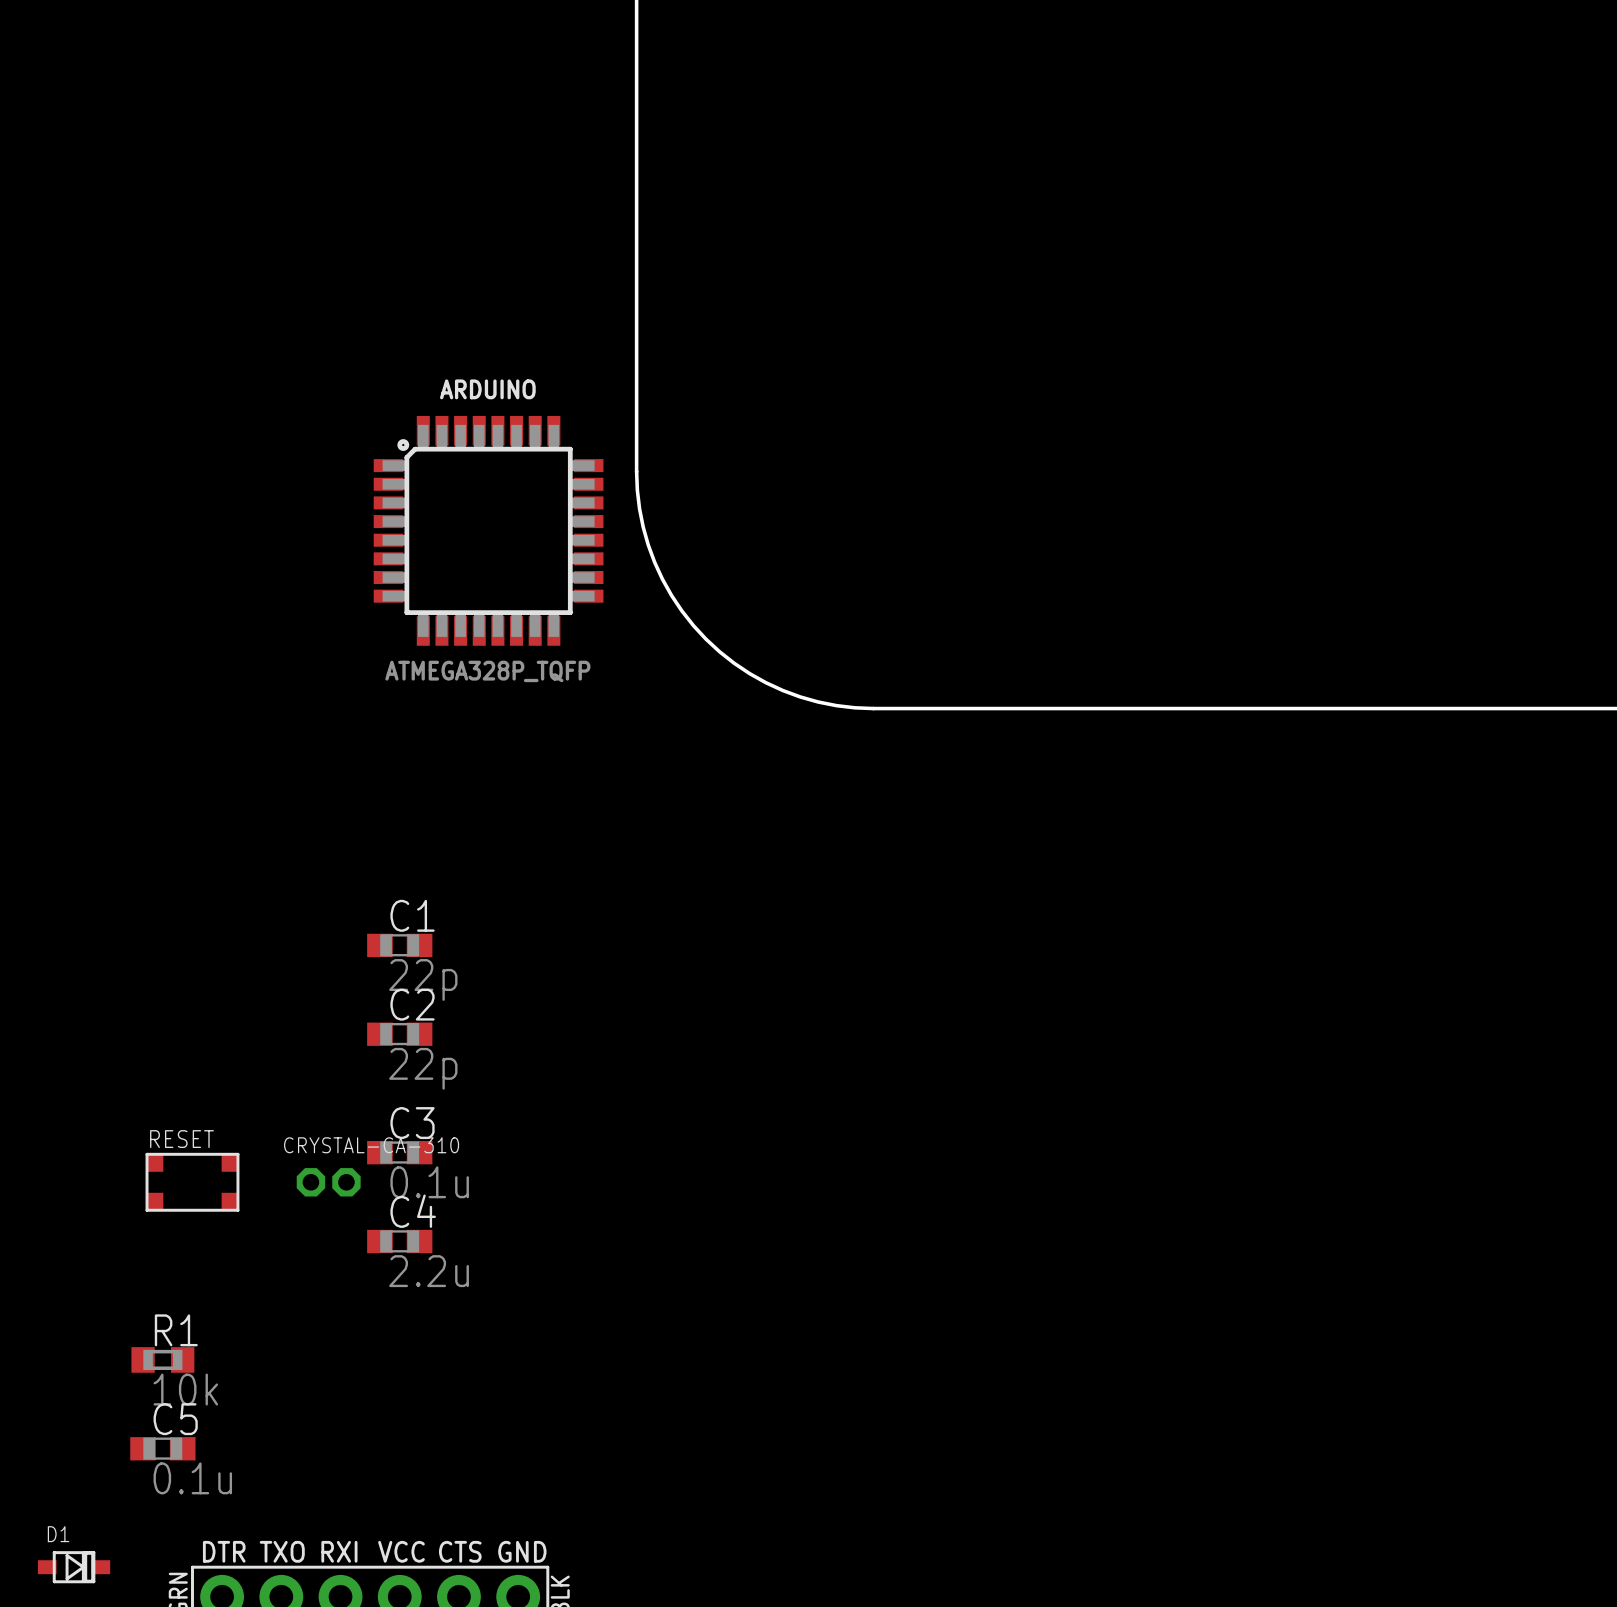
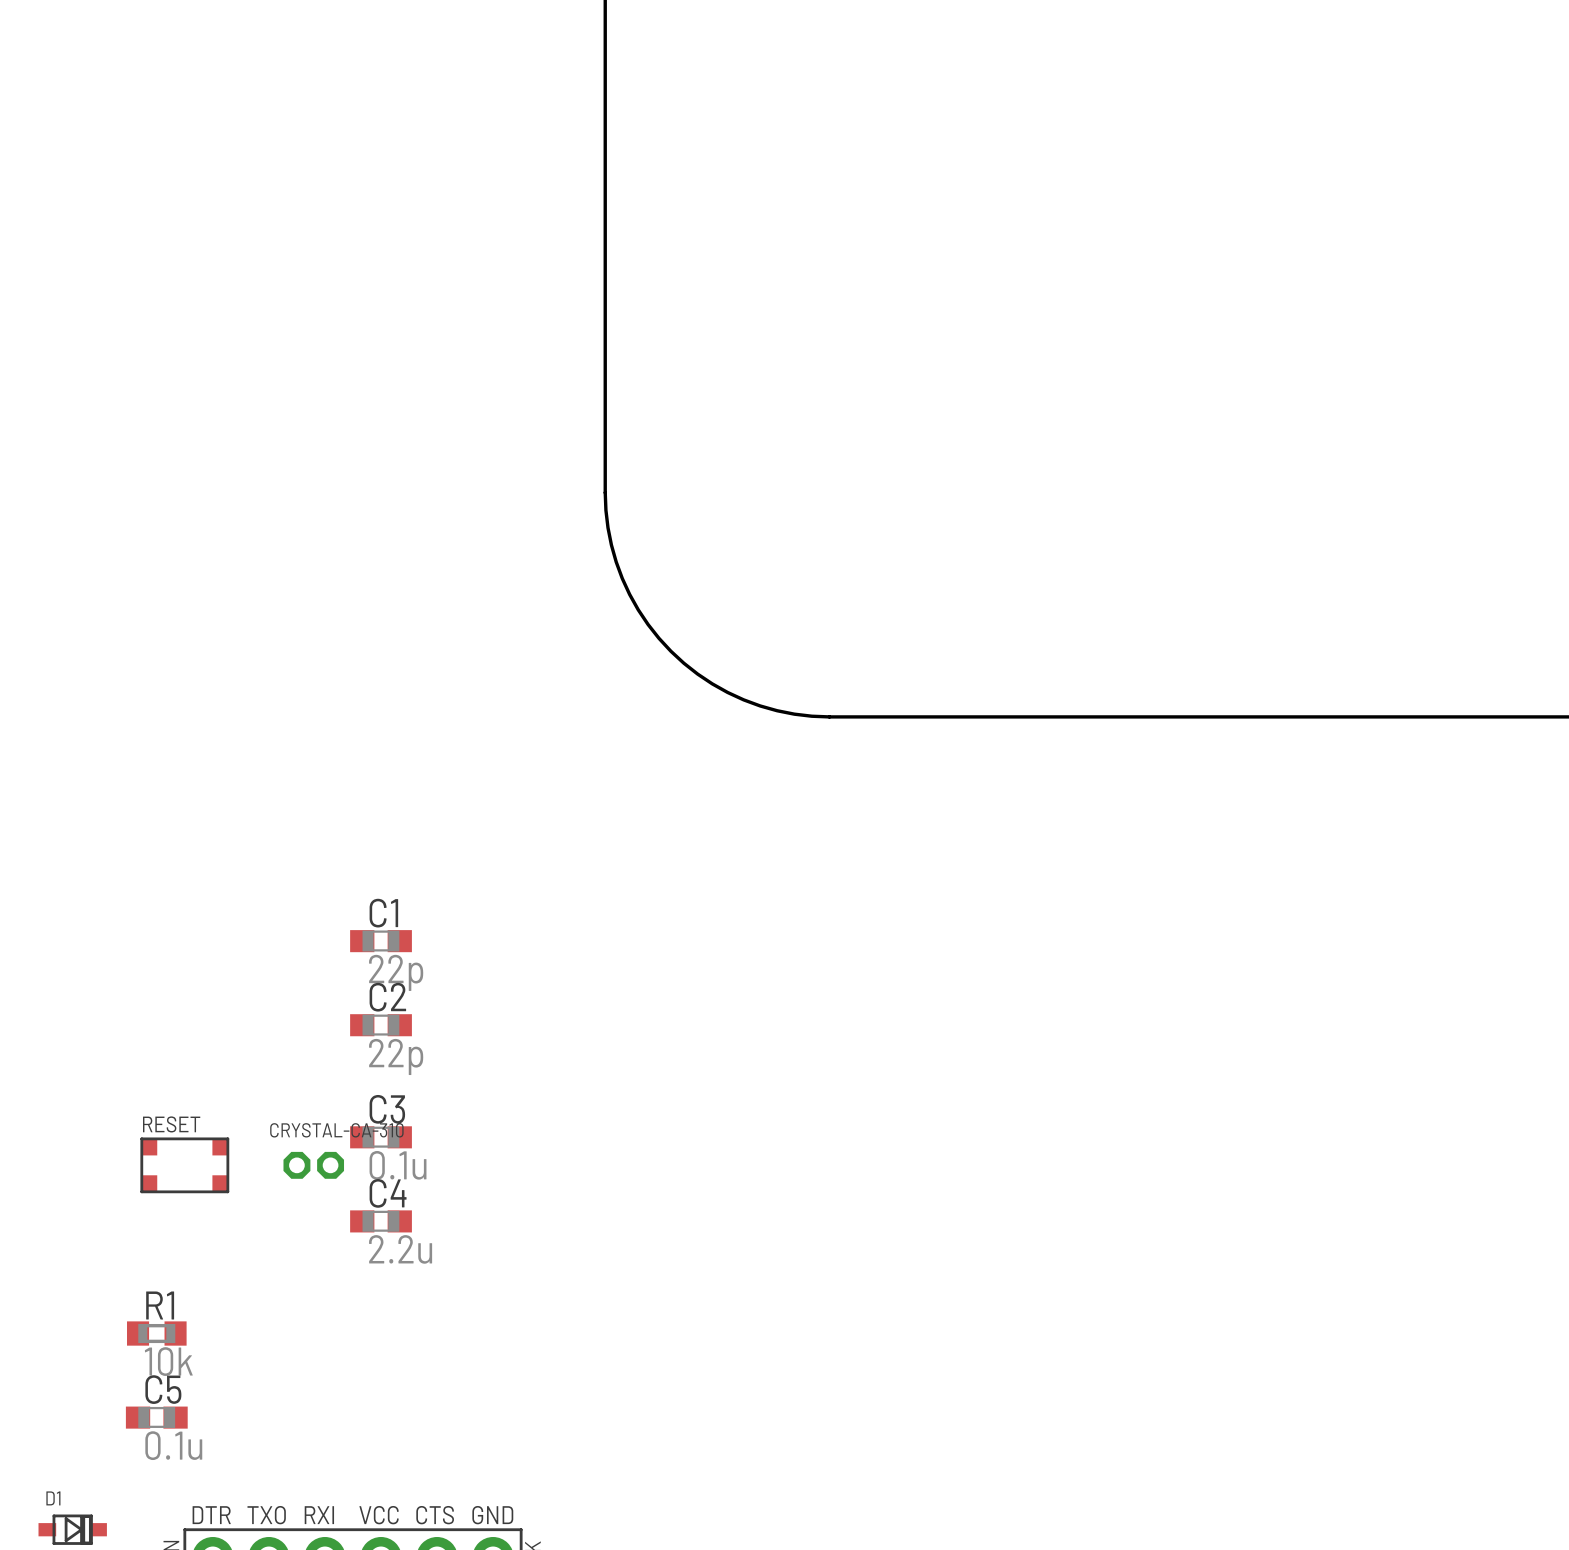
ARDUINO: ATMEGA328P_TQFP (488, 530) -> none

